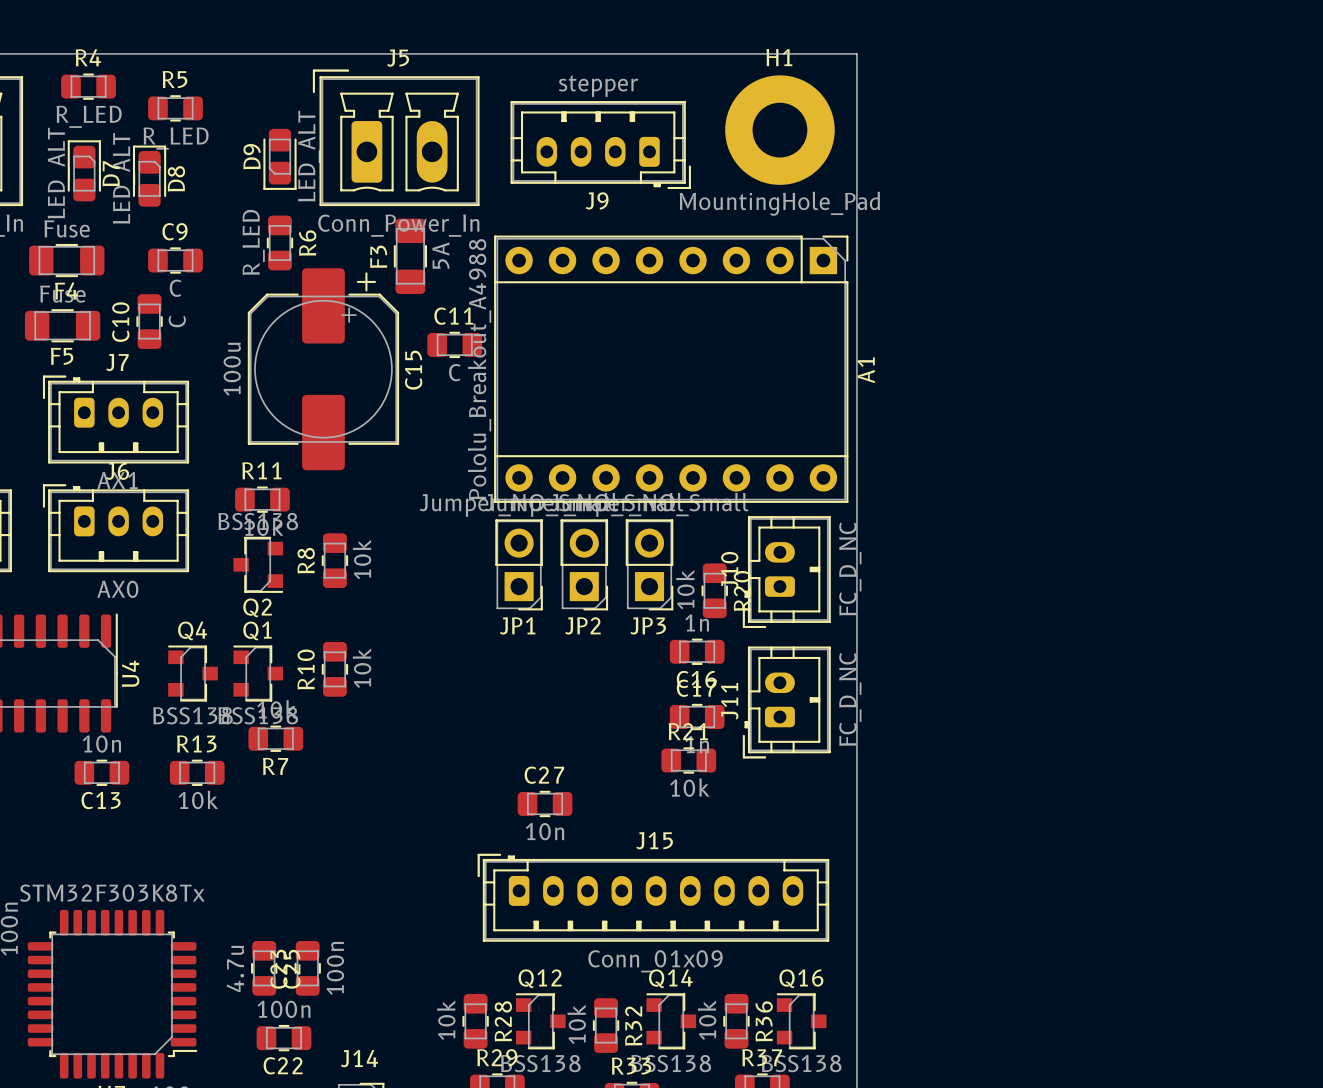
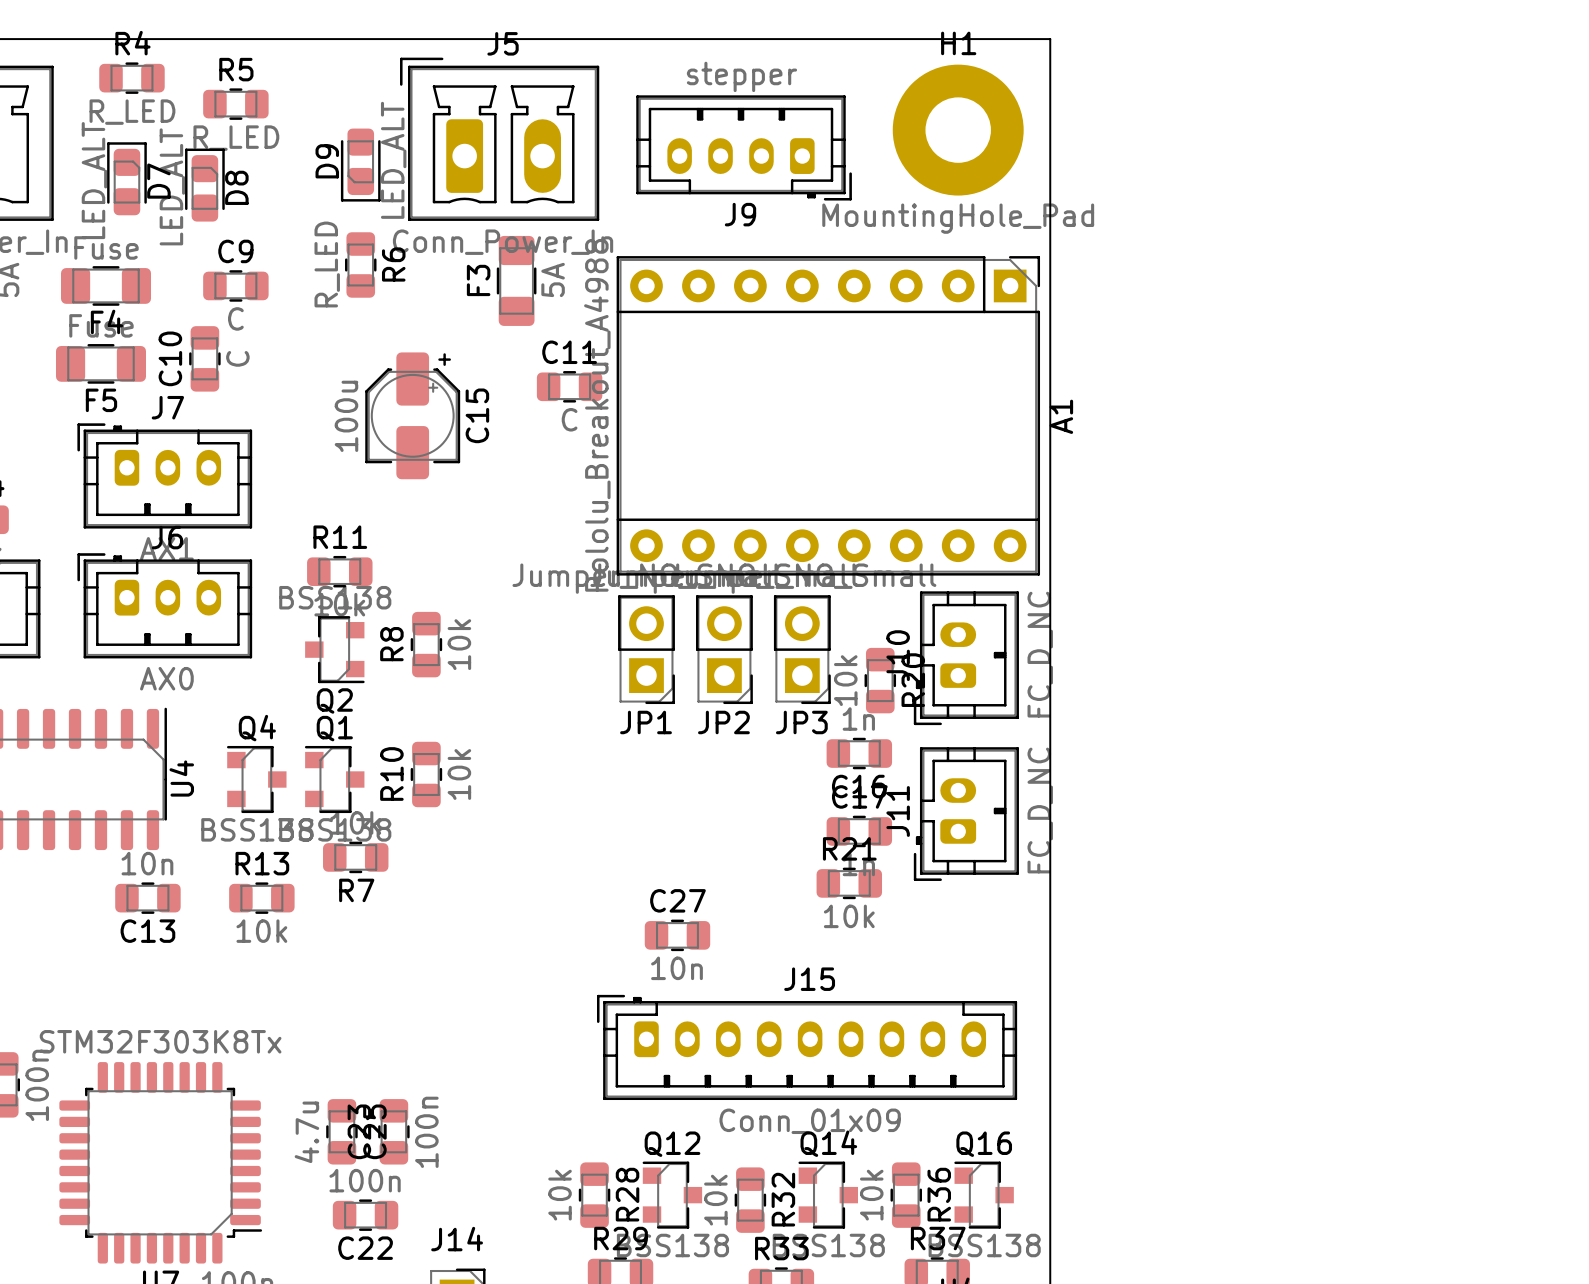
C15 footprint: [247, 268, 400, 471] -> [365, 352, 461, 480]
C15 value position: 100u (232, 369) -> 100u (346, 416)
C15 name position: C15 (413, 370) -> C15 (477, 415)

